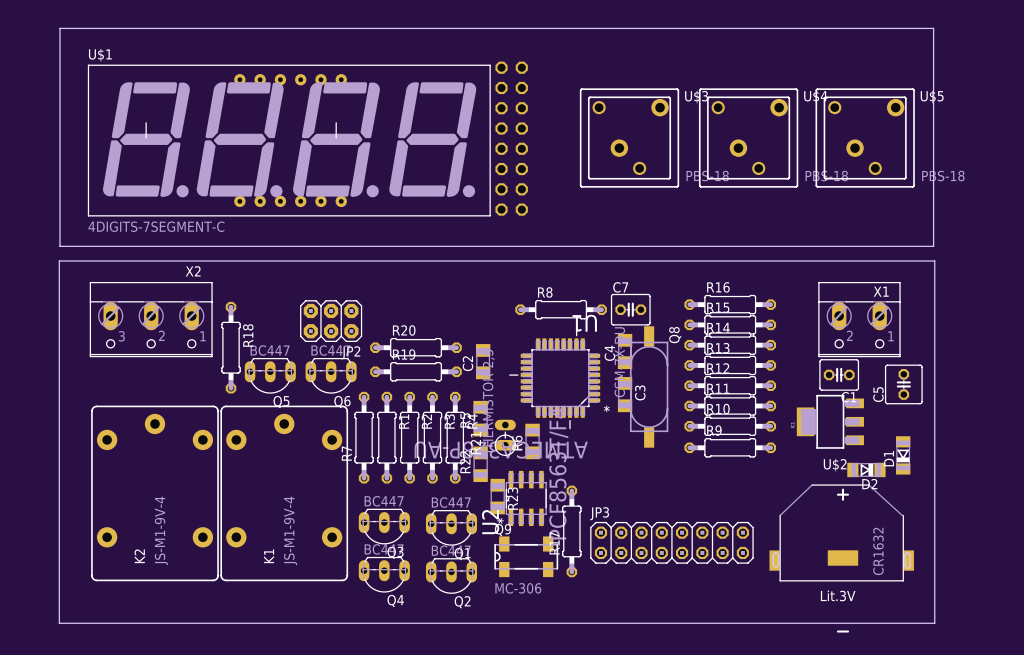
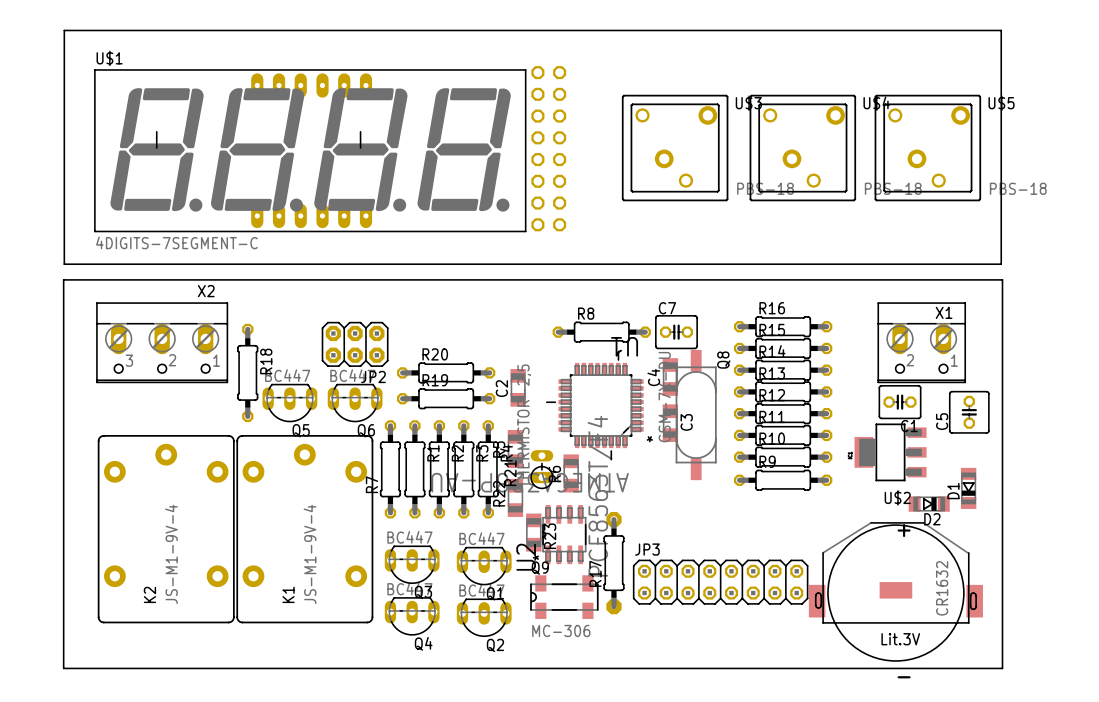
U$1 footprint: [87, 64, 491, 217] -> [94, 69, 527, 233]
U$2 footprint: [769, 484, 914, 633] -> [808, 522, 984, 679]
R17 footprint: [562, 485, 582, 578] -> [603, 512, 625, 615]

